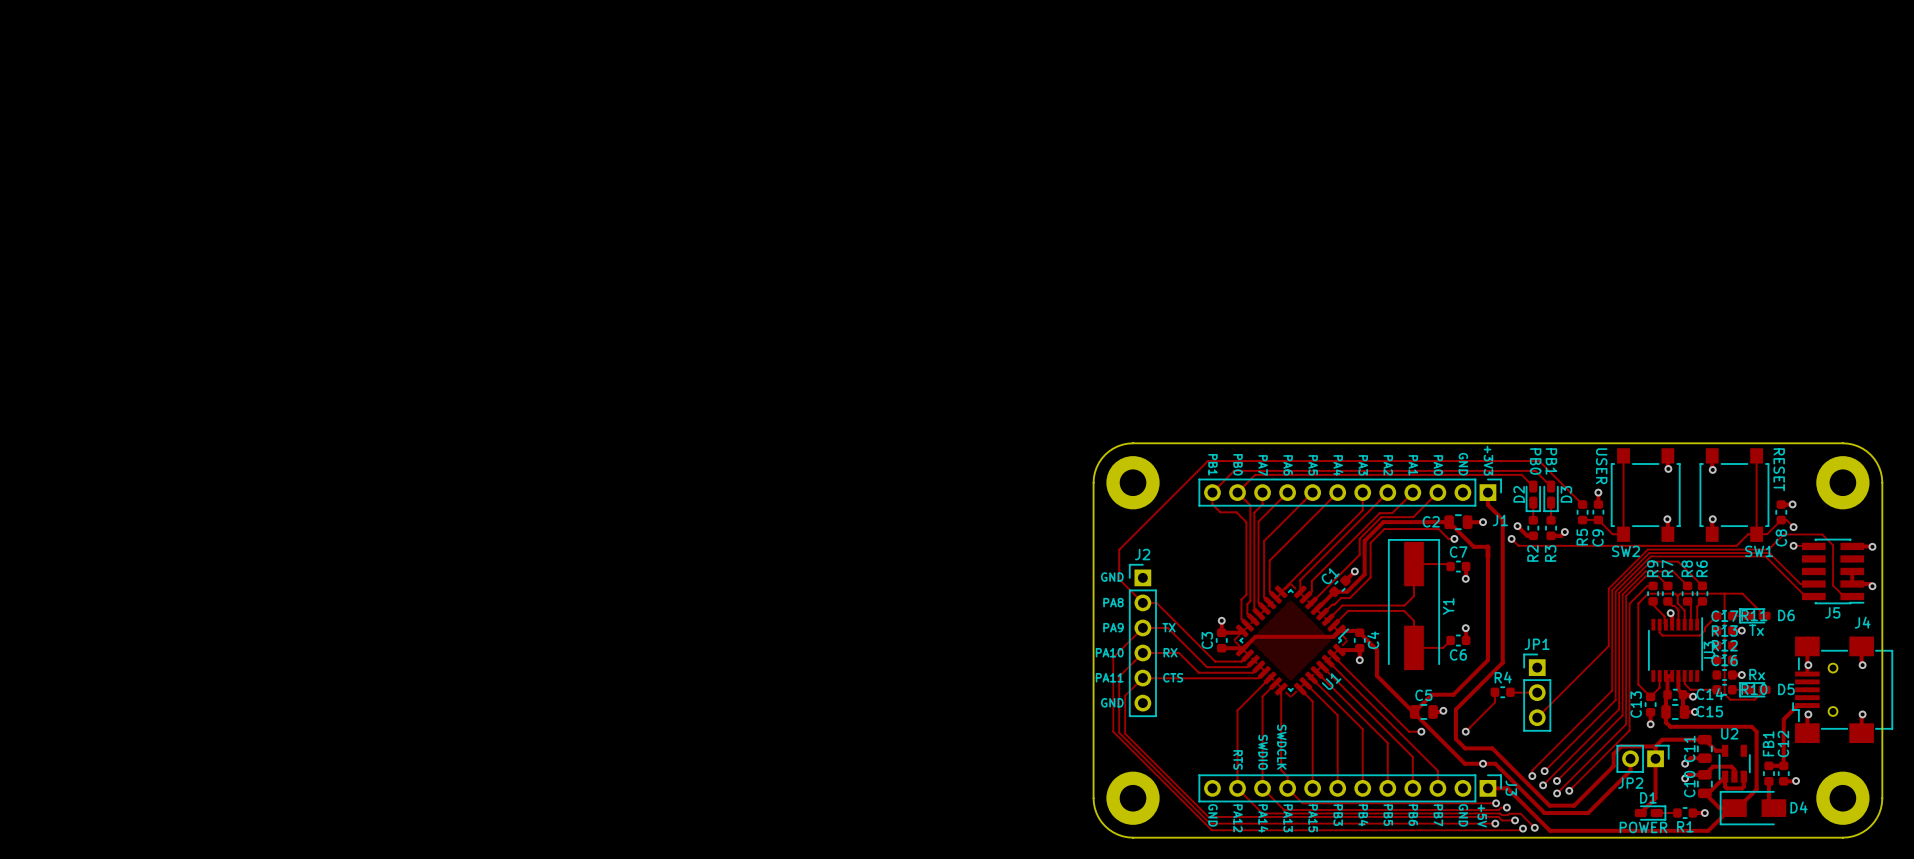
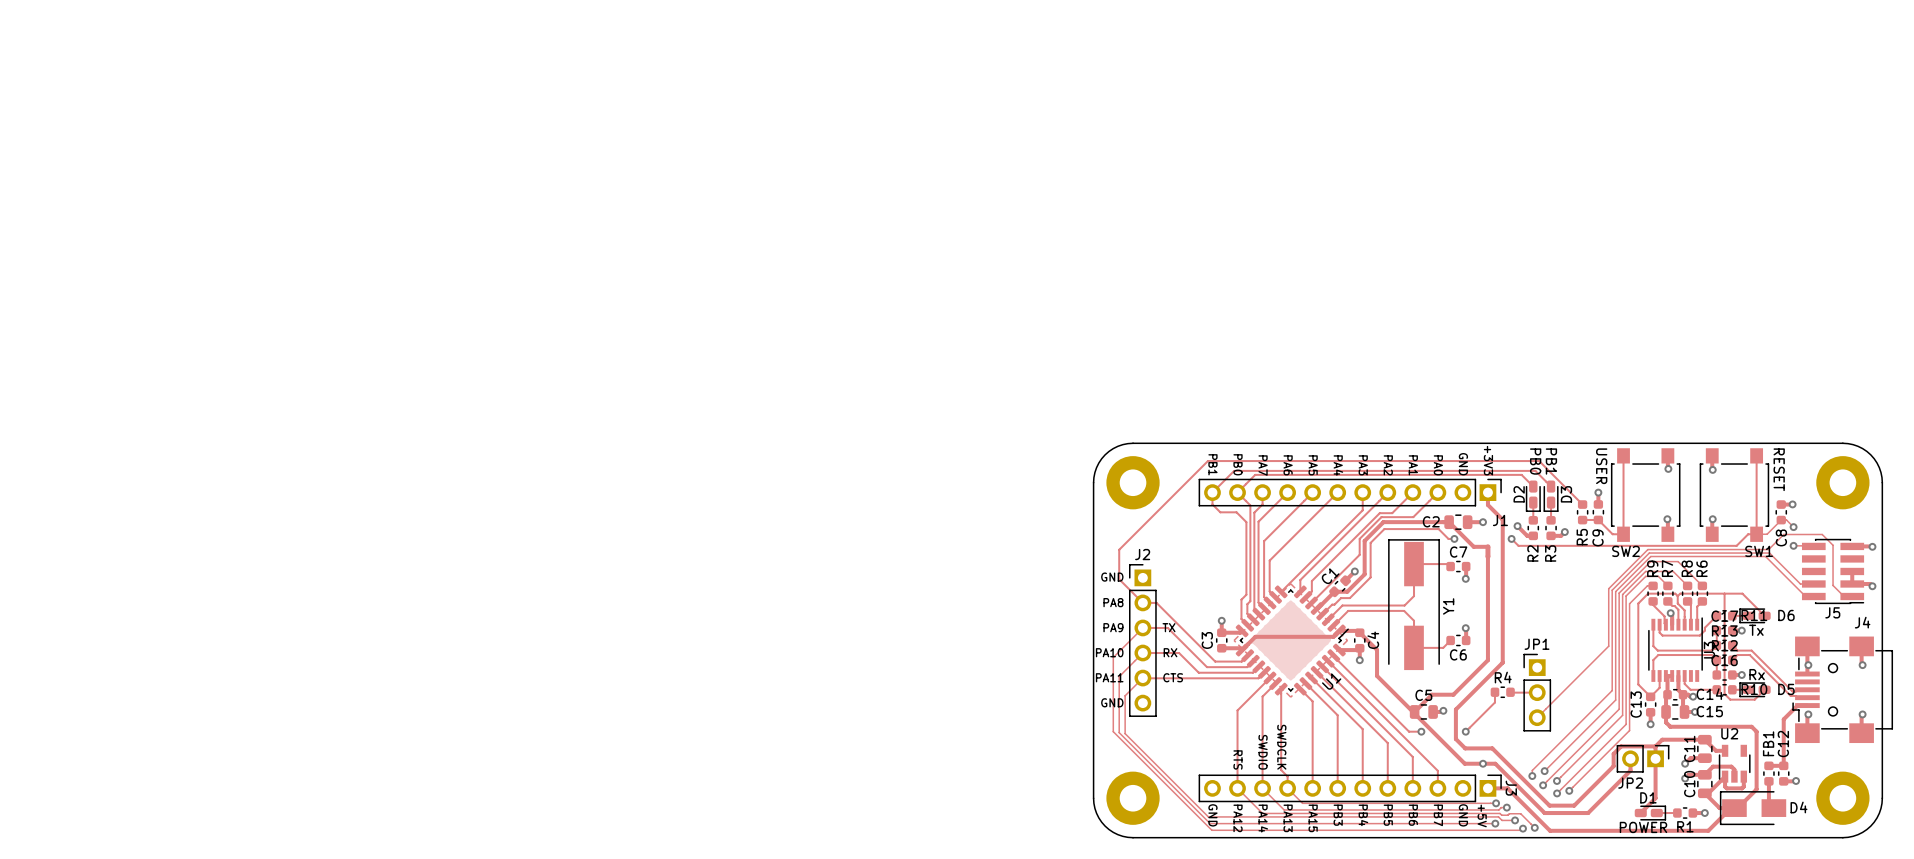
track: none -> (1653, 624) (1653, 646) (1657, 650) (1711, 650) (1716, 645) (1716, 630)
track: none -> (1732, 645) (1737, 650) (1751, 650) (1792, 691) (1807, 689)
track: none -> (1732, 660) (1737, 655) (1749, 655) (1790, 695) (1807, 697)
track: none -> (1716, 674) (1716, 660) (1711, 655) (1658, 655) (1653, 660) (1653, 675)

